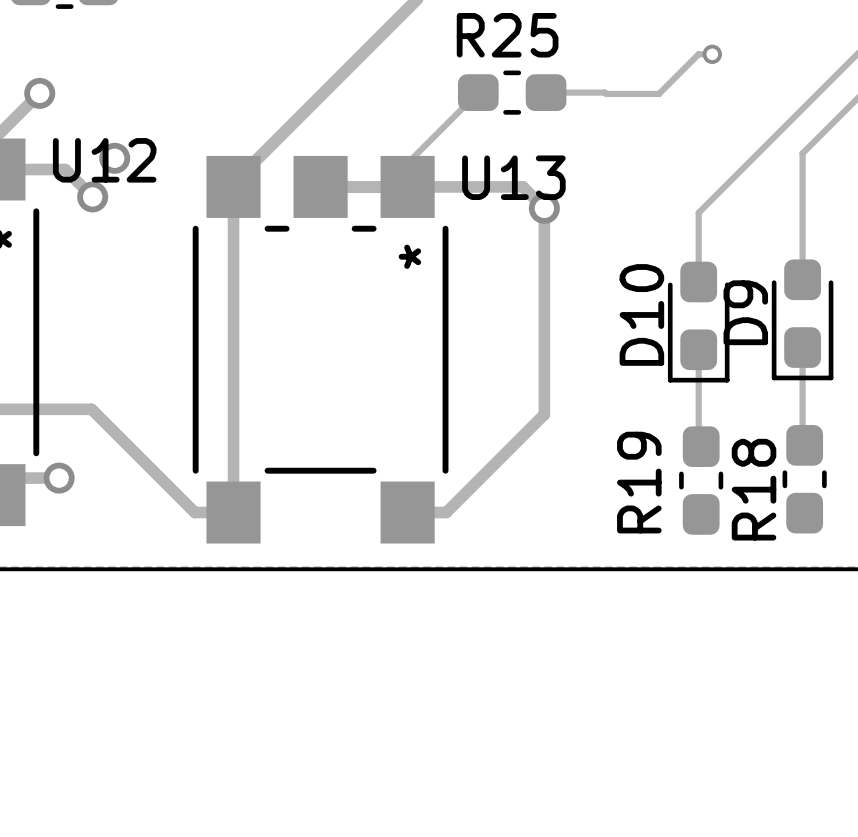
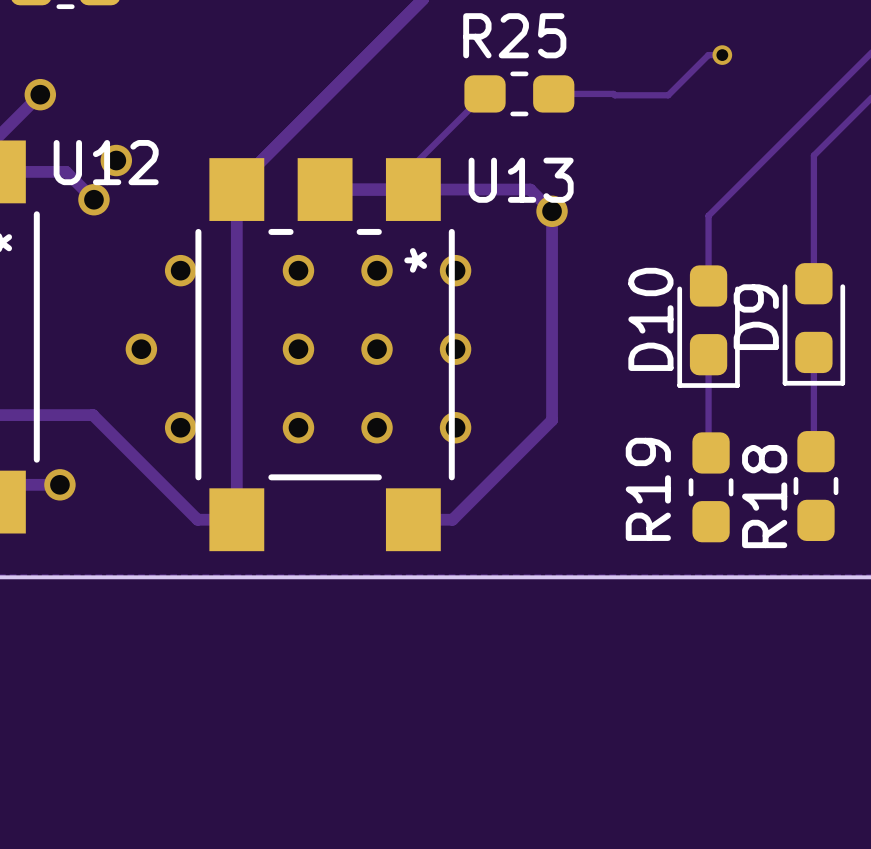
via: none -> (180, 270)
via: none -> (298, 270)
via: none -> (377, 270)
via: none -> (455, 270)
via: none -> (141, 349)
via: none -> (298, 349)
via: none -> (377, 349)
via: none -> (455, 349)
via: none -> (180, 427)
via: none -> (298, 427)
via: none -> (377, 427)
via: none -> (455, 427)

